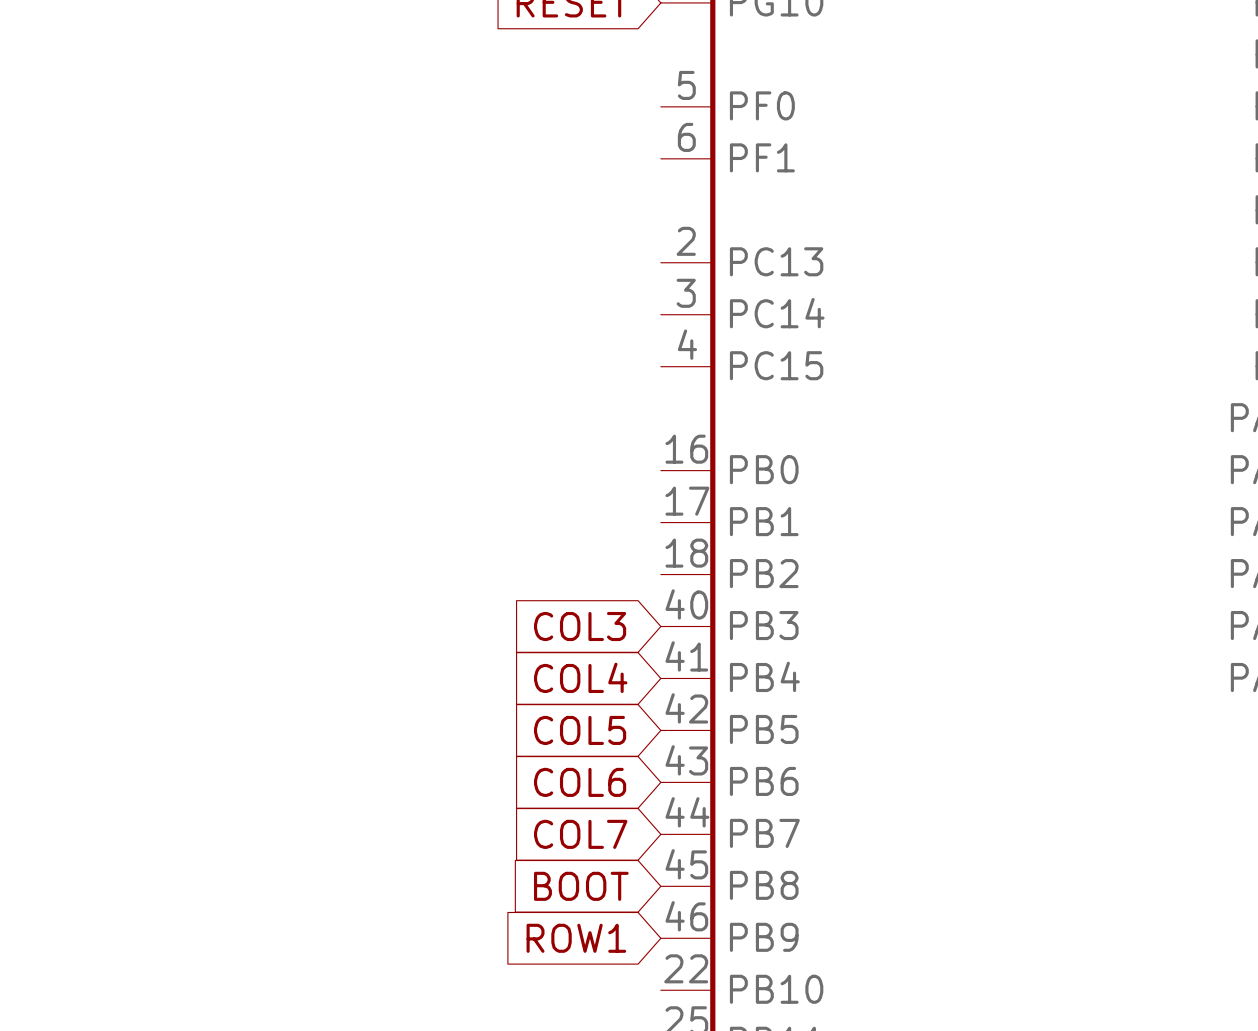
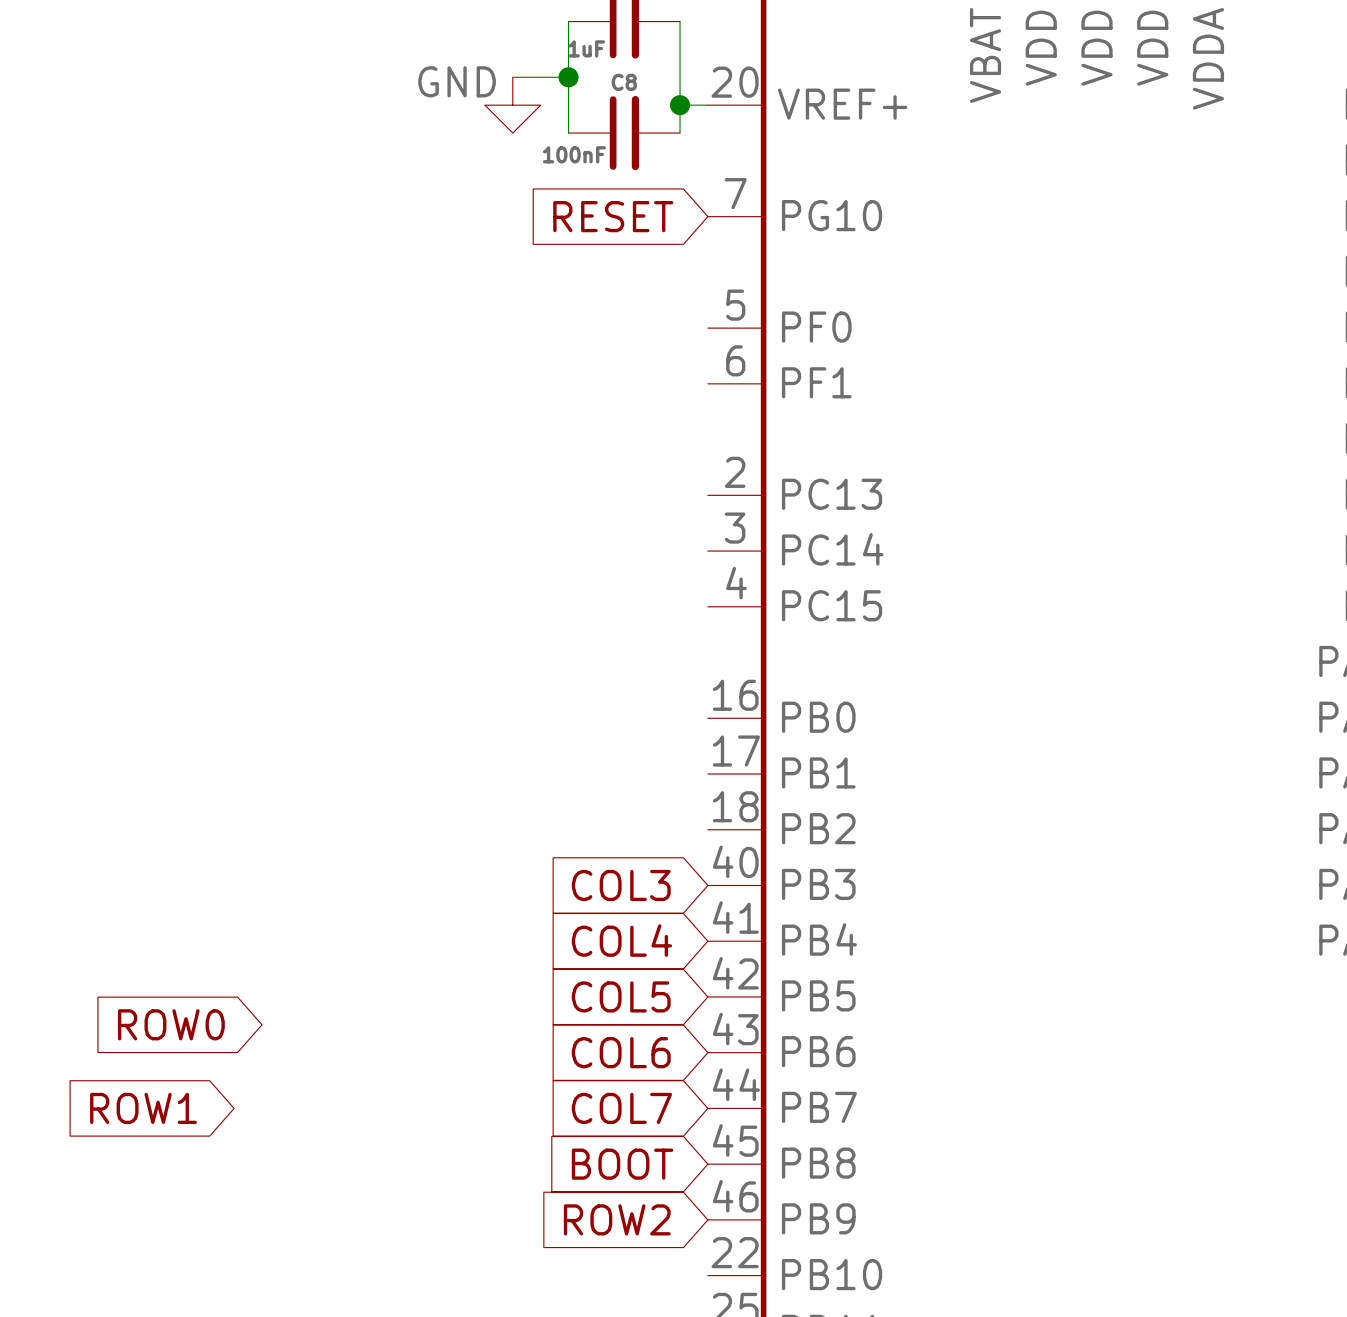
global label: none -> ROW0 (171, 1024)
global label: none -> ROW1 (143, 1108)
global label: ROW1 (576, 938) -> ROW2 (617, 1219)

